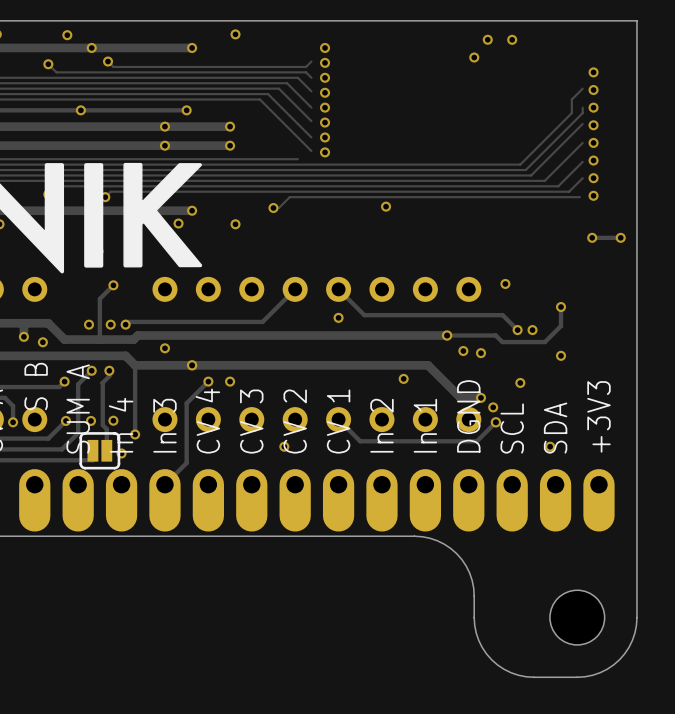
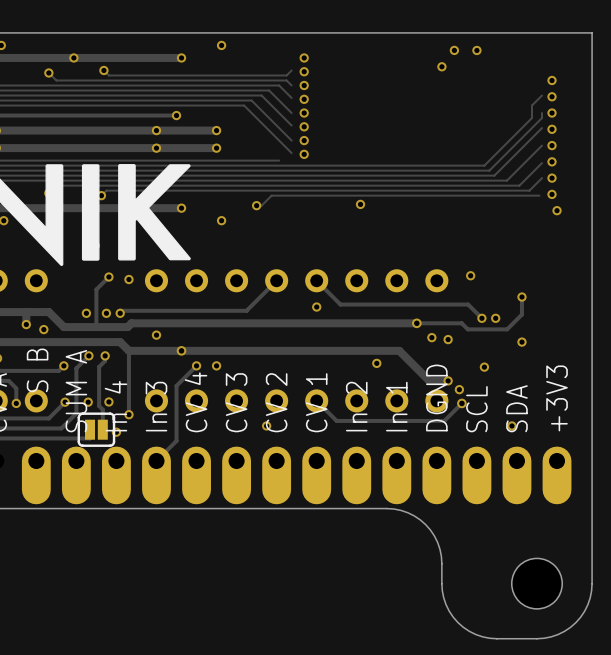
via: (67, 35) -> none
via: none -> (73, 57)
via: (91, 47) -> none
via: (80, 110) -> none
via: none -> (557, 210)
via position: (178, 223) -> (128, 279)
via: (592, 237) -> none
track: (620, 237) (592, 237) -> none
via: (620, 237) -> none

